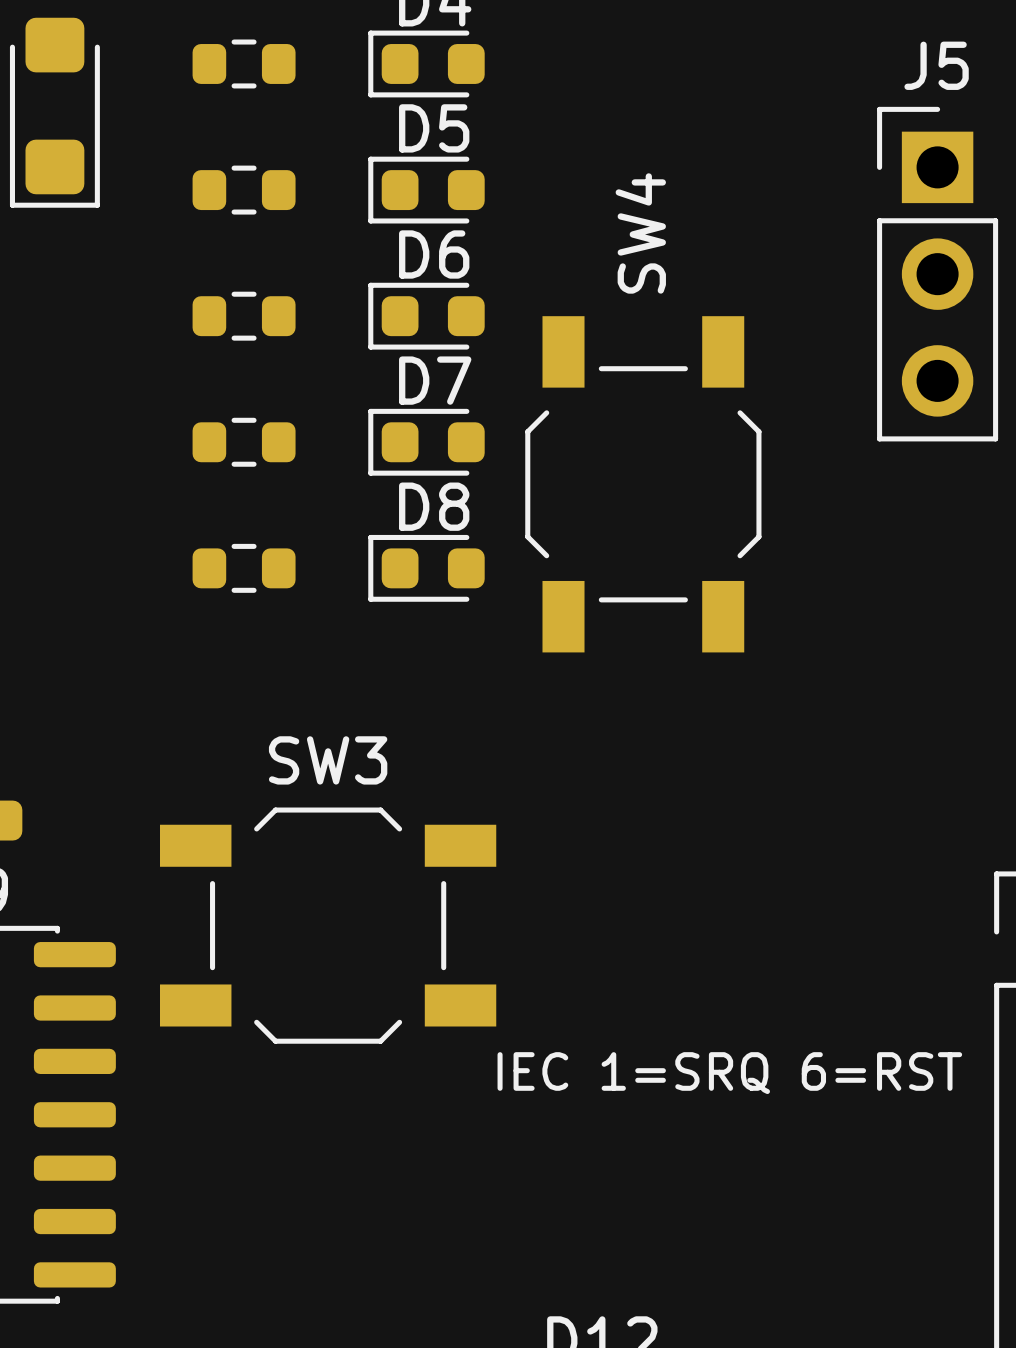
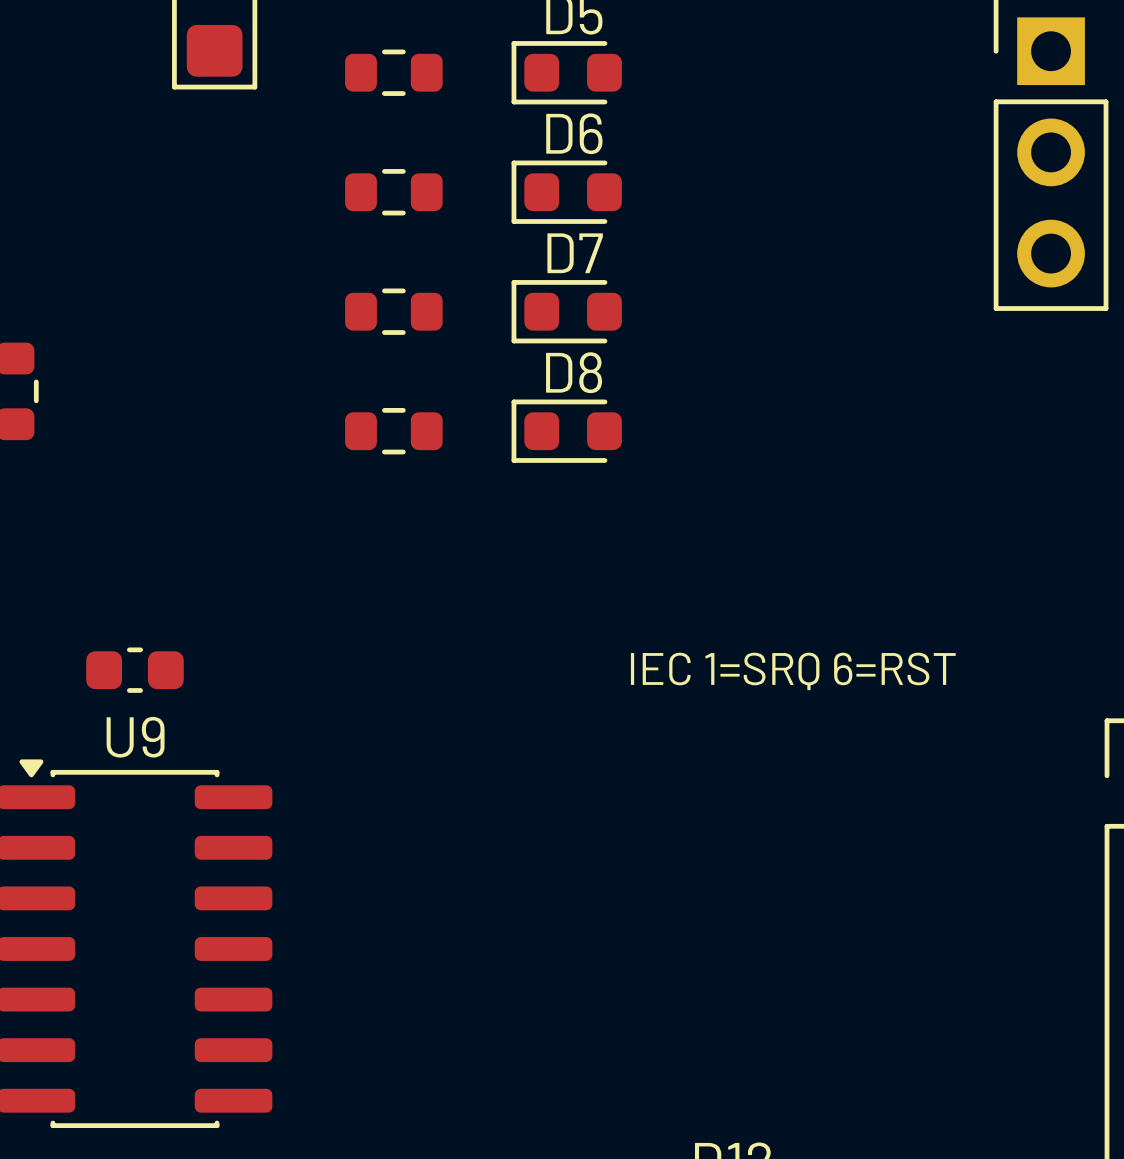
SW4: (643, 484) -> none
SW3: (328, 925) -> none
text position: IEC 1=SRQ 6=RST (729, 1073) -> IEC 1=SRQ 6=RST (793, 671)

